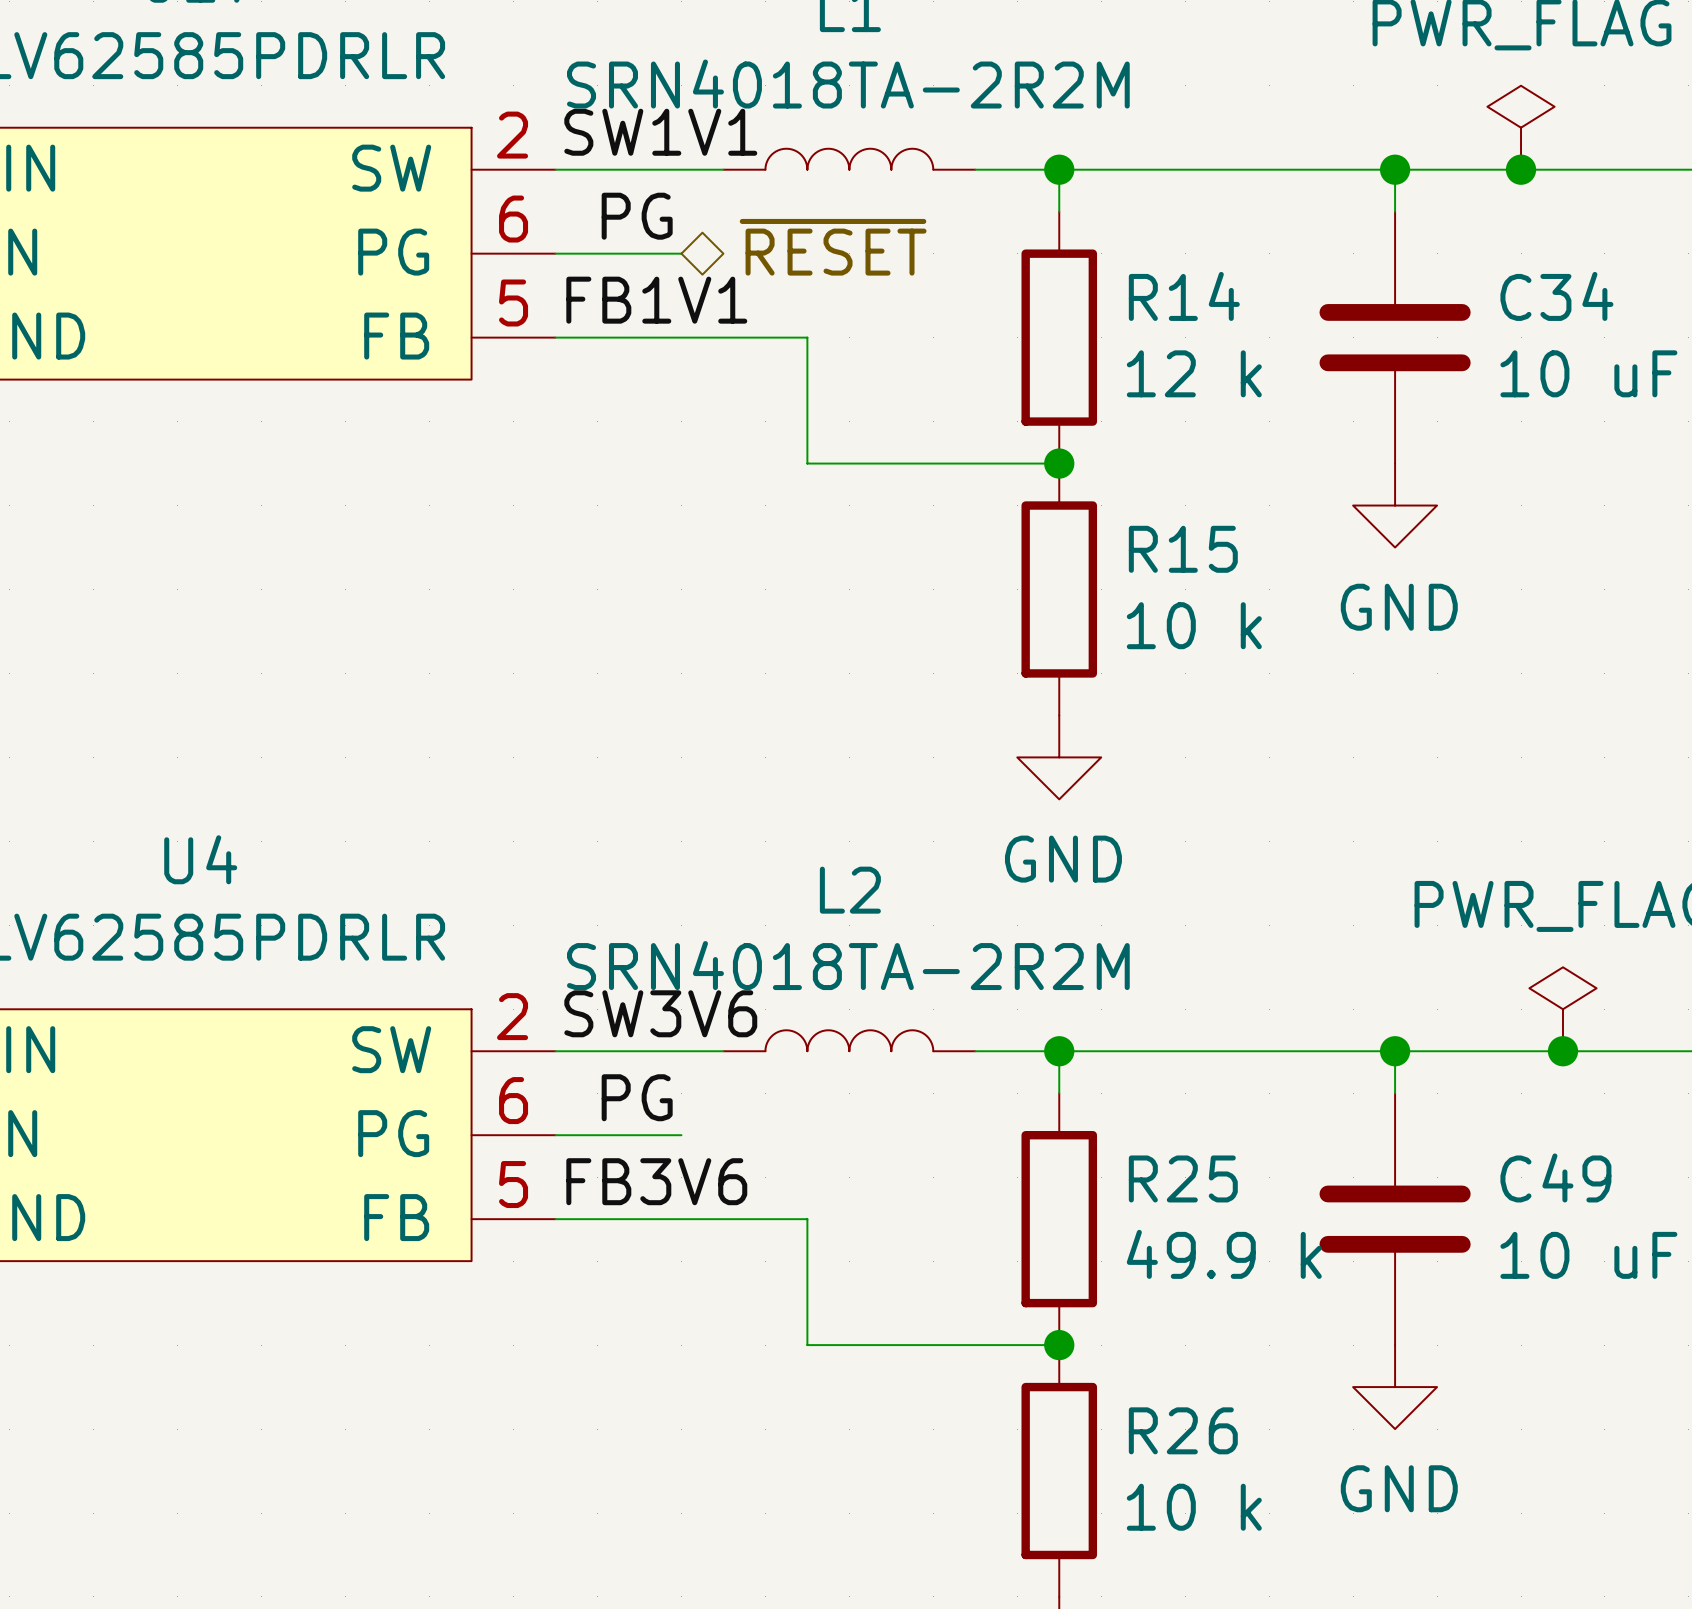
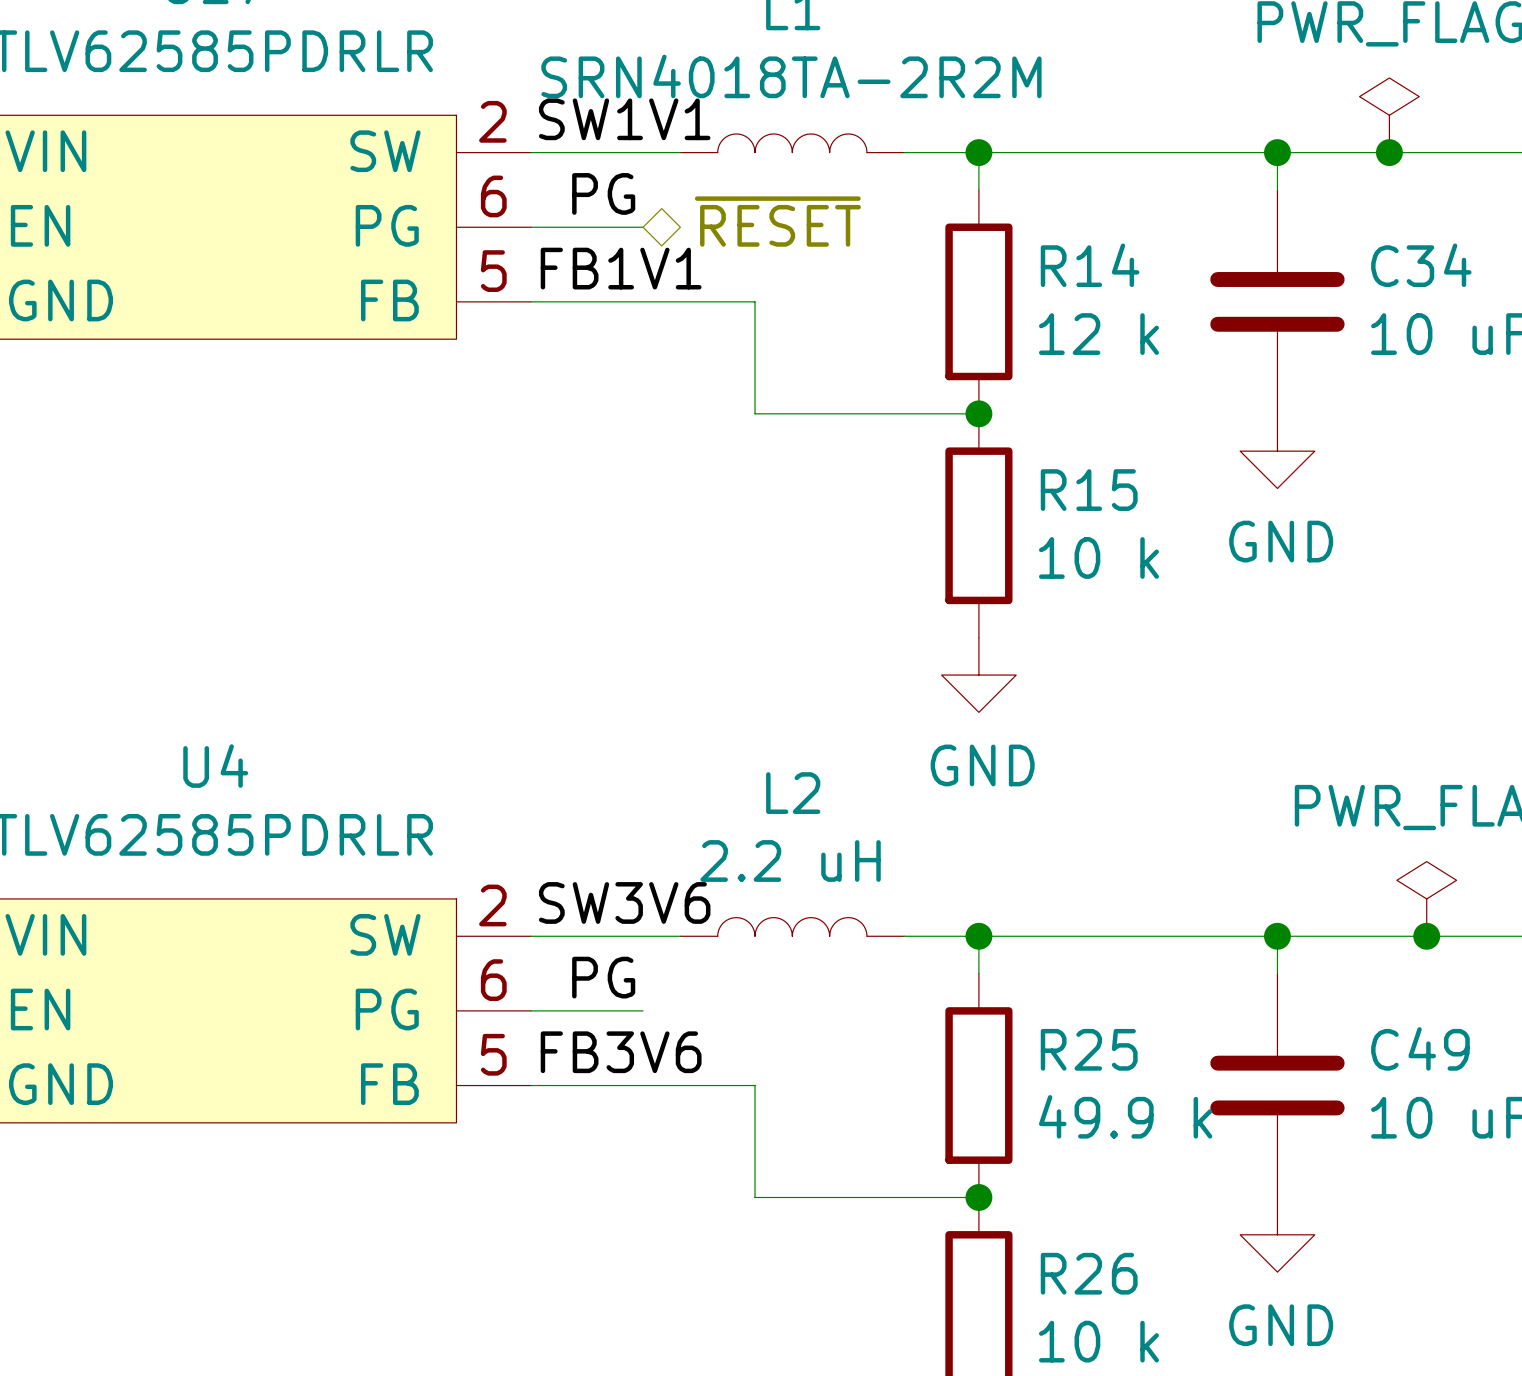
L2 value: SRN4018TA-2R2M (848, 965) -> 2.2 uH (790, 860)

